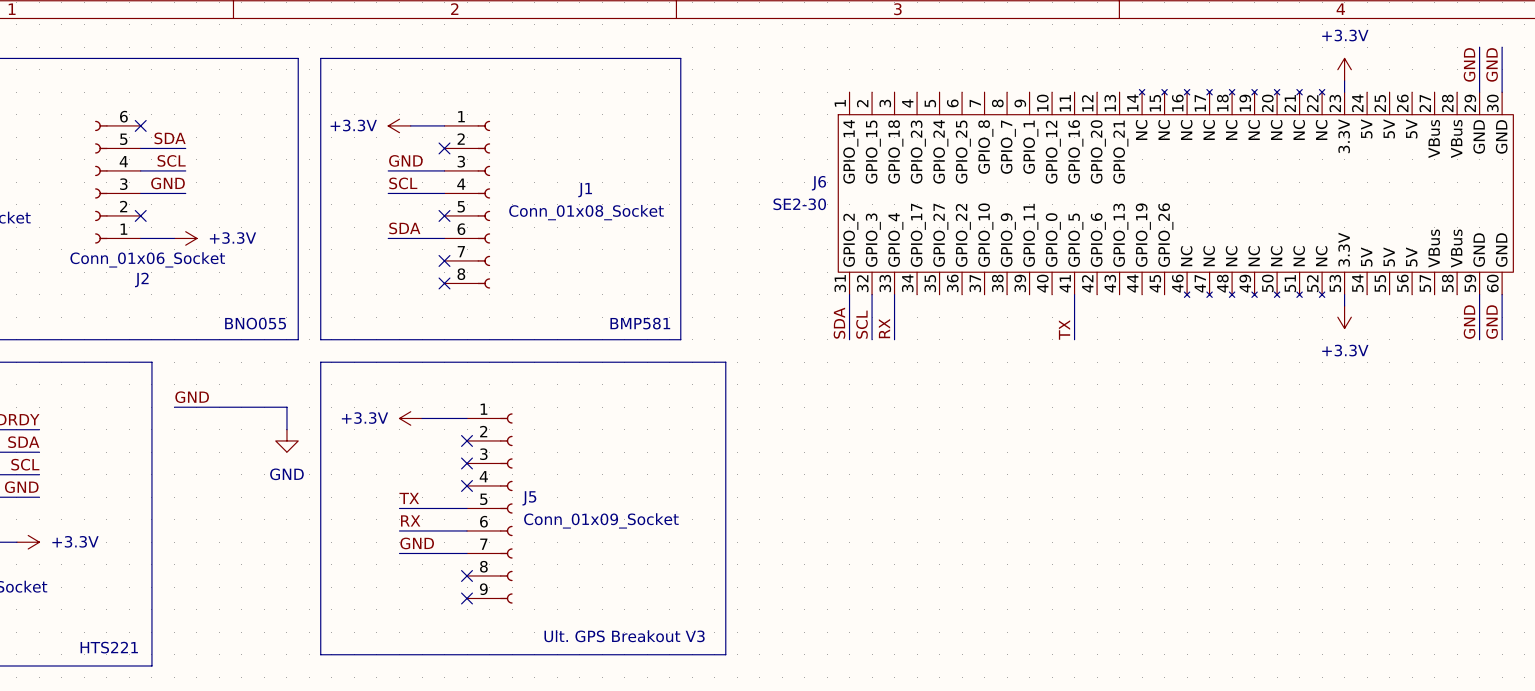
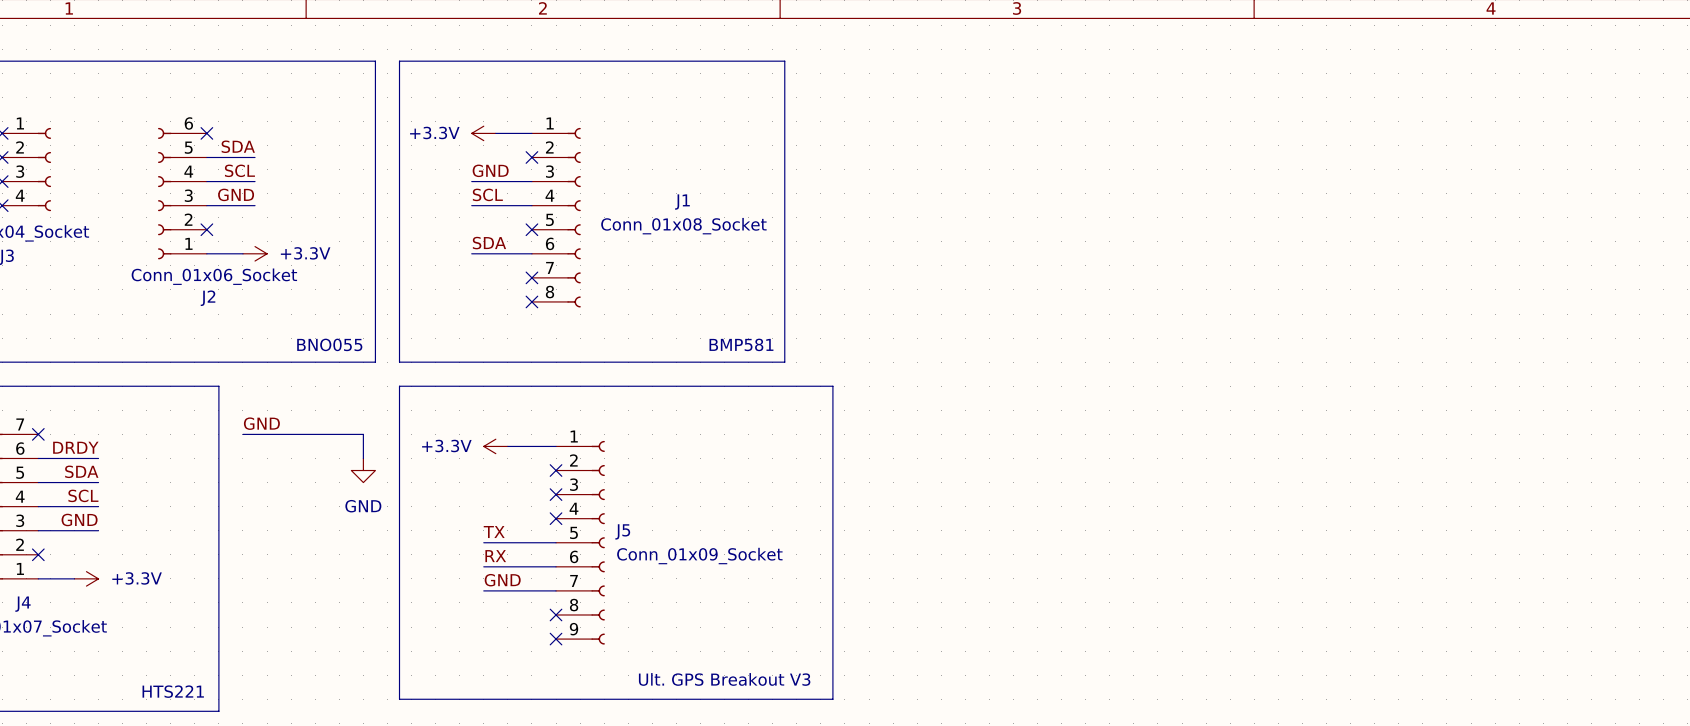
wire: (1479, 47) (1479, 92) -> none
wire: (1502, 47) (1502, 92) -> none
label: GND (1469, 64) -> none
label: GND (1492, 64) -> none
power symbol: +3.3V (1344, 69) -> none
wire: (1344, 80) (1344, 92) -> none
J6: SE2-30 (1175, 193) -> none
wire: (849, 294) (849, 339) -> none
wire: (872, 294) (872, 339) -> none
wire: (894, 294) (894, 339) -> none
wire: (1074, 294) (1074, 339) -> none
wire: (1344, 294) (1344, 305) -> none
wire: (1479, 294) (1479, 339) -> none
wire: (1502, 294) (1502, 339) -> none
power symbol: +3.3V (1344, 317) -> none
label: GND (1469, 322) -> none
label: GND (1492, 322) -> none
label: SDA (839, 323) -> none
label: SCL (862, 324) -> none
label: RX (884, 328) -> none
label: TX (1064, 329) -> none

